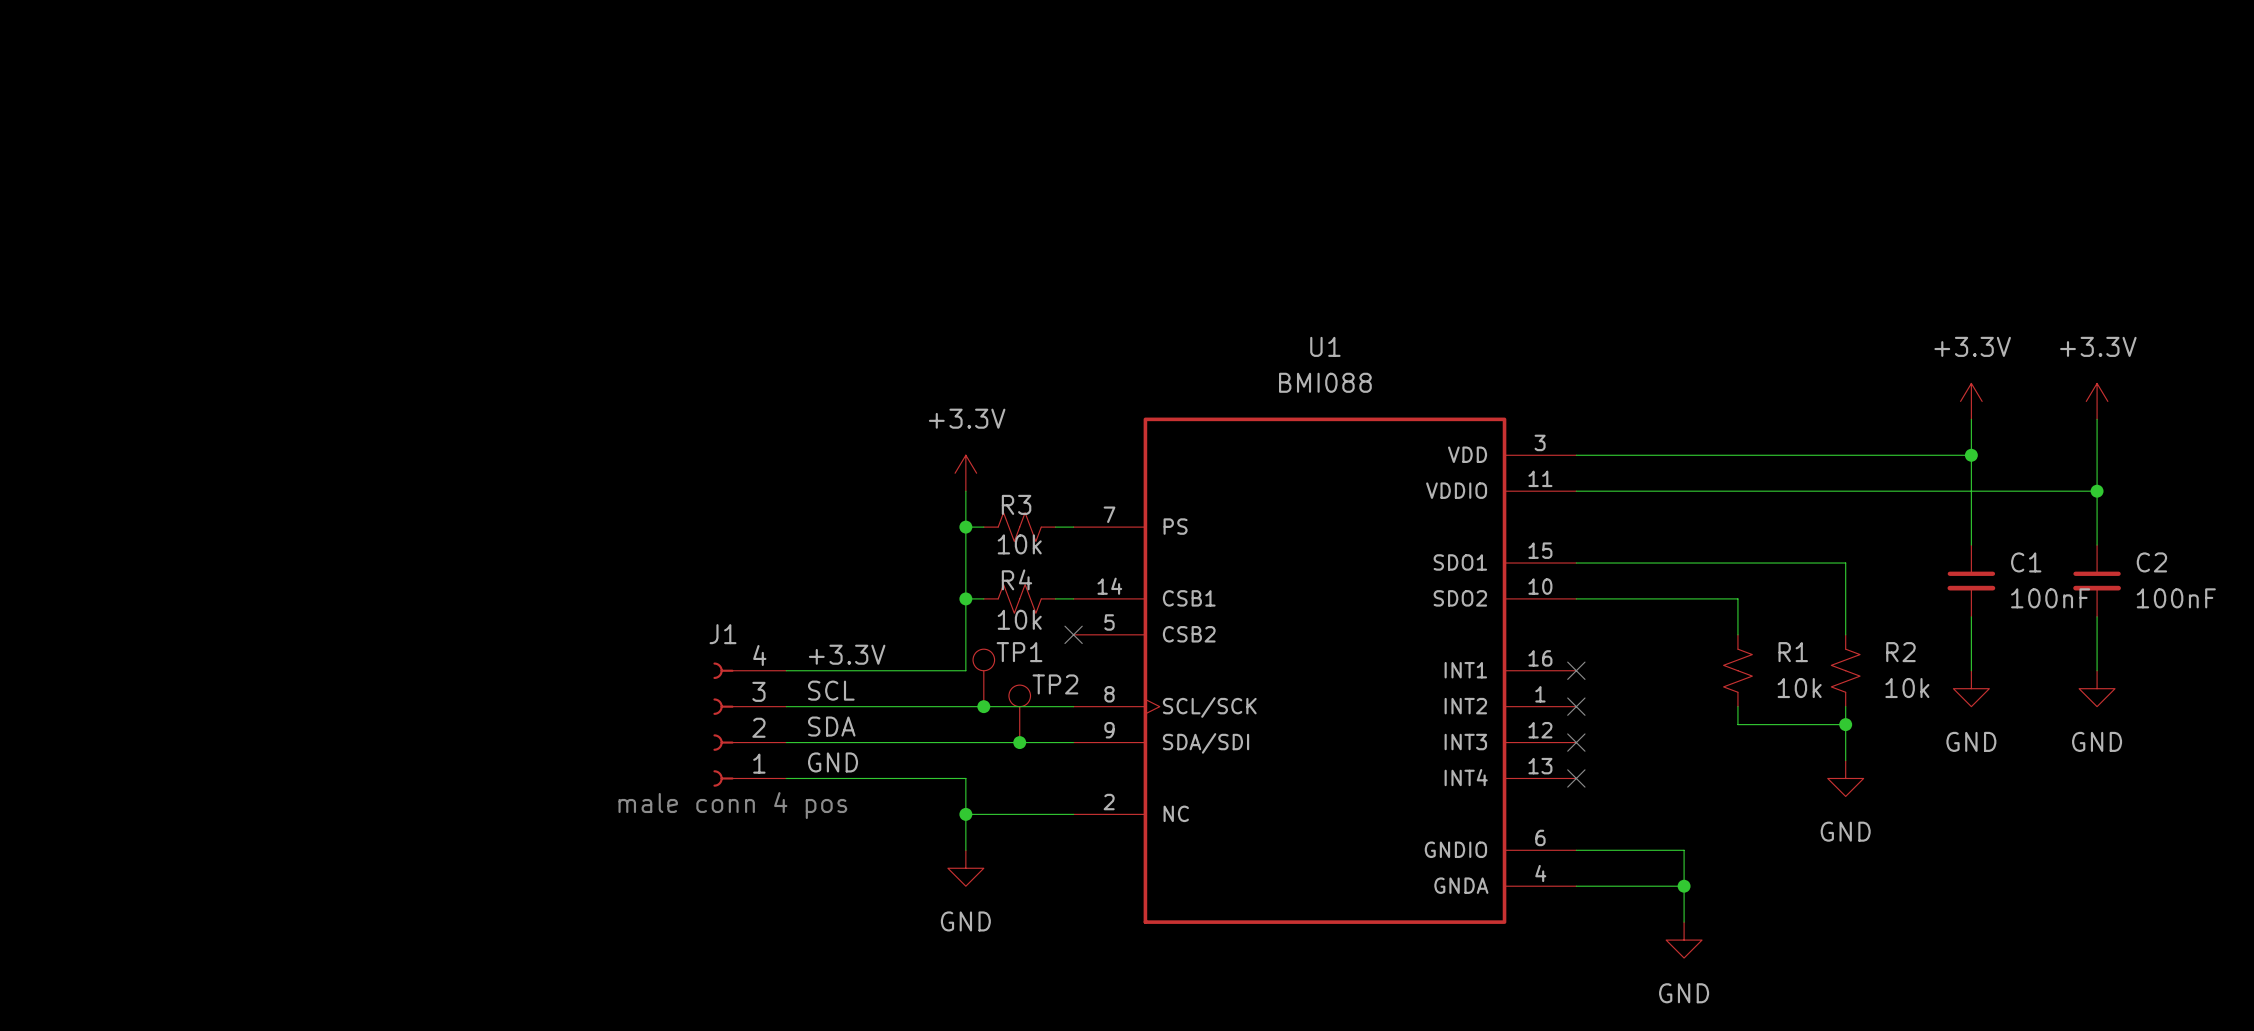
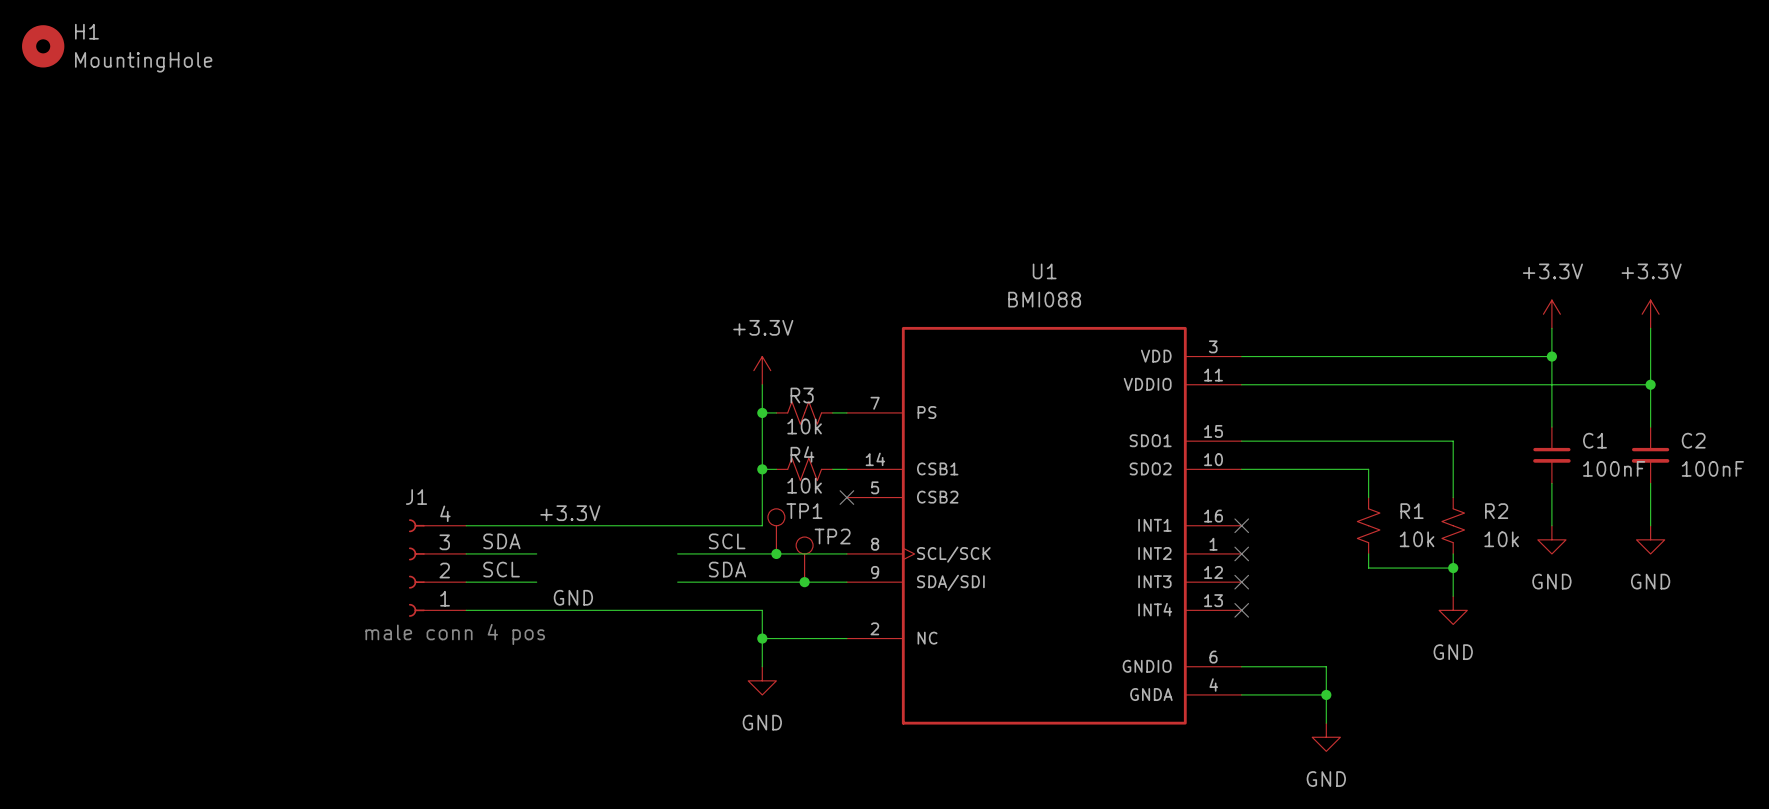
H1: none -> MountingHole (43, 46)
label position: +3.3V (847, 654) -> +3.3V (570, 513)
wire: none -> (466, 525) (621, 525)
label: none -> SDA (501, 541)
label position: SCL (831, 690) -> SCL (727, 541)
wire: none -> (466, 553) (536, 553)
wire: (786, 706) (858, 706) -> none
J1 position: (749, 724) -> (437, 568)
label: none -> SCL (501, 569)
label position: SDA (831, 726) -> SDA (727, 569)
wire: none -> (466, 582) (536, 582)
wire: (786, 742) (858, 742) -> none
label position: GND (833, 762) -> GND (573, 597)
wire: none -> (466, 610) (621, 610)
text position: male conn 4 pos (732, 805) -> male conn 4 pos (455, 634)

